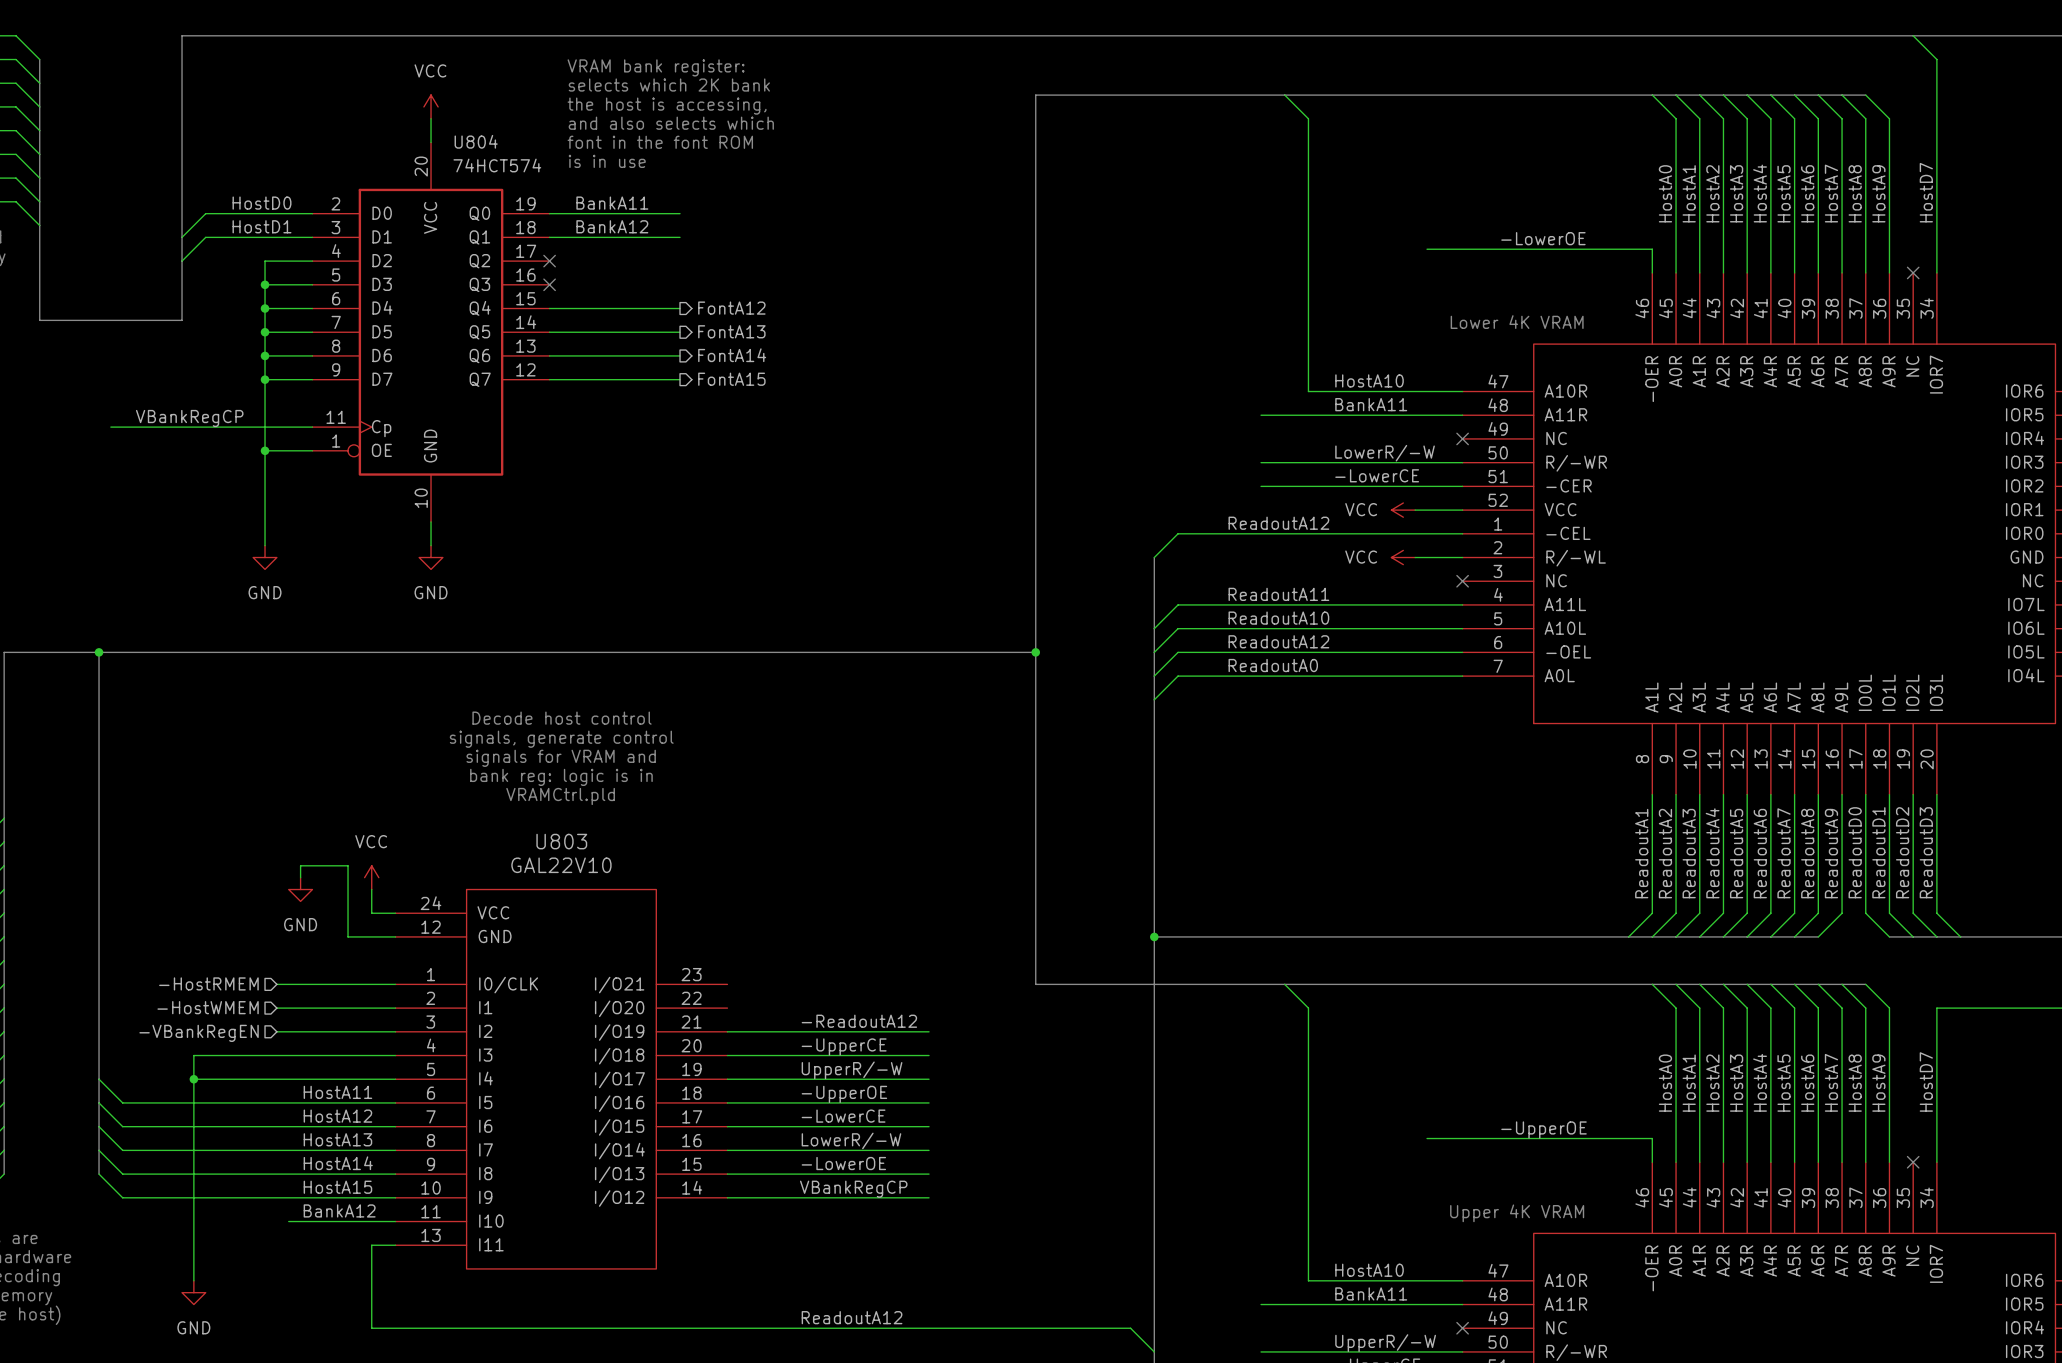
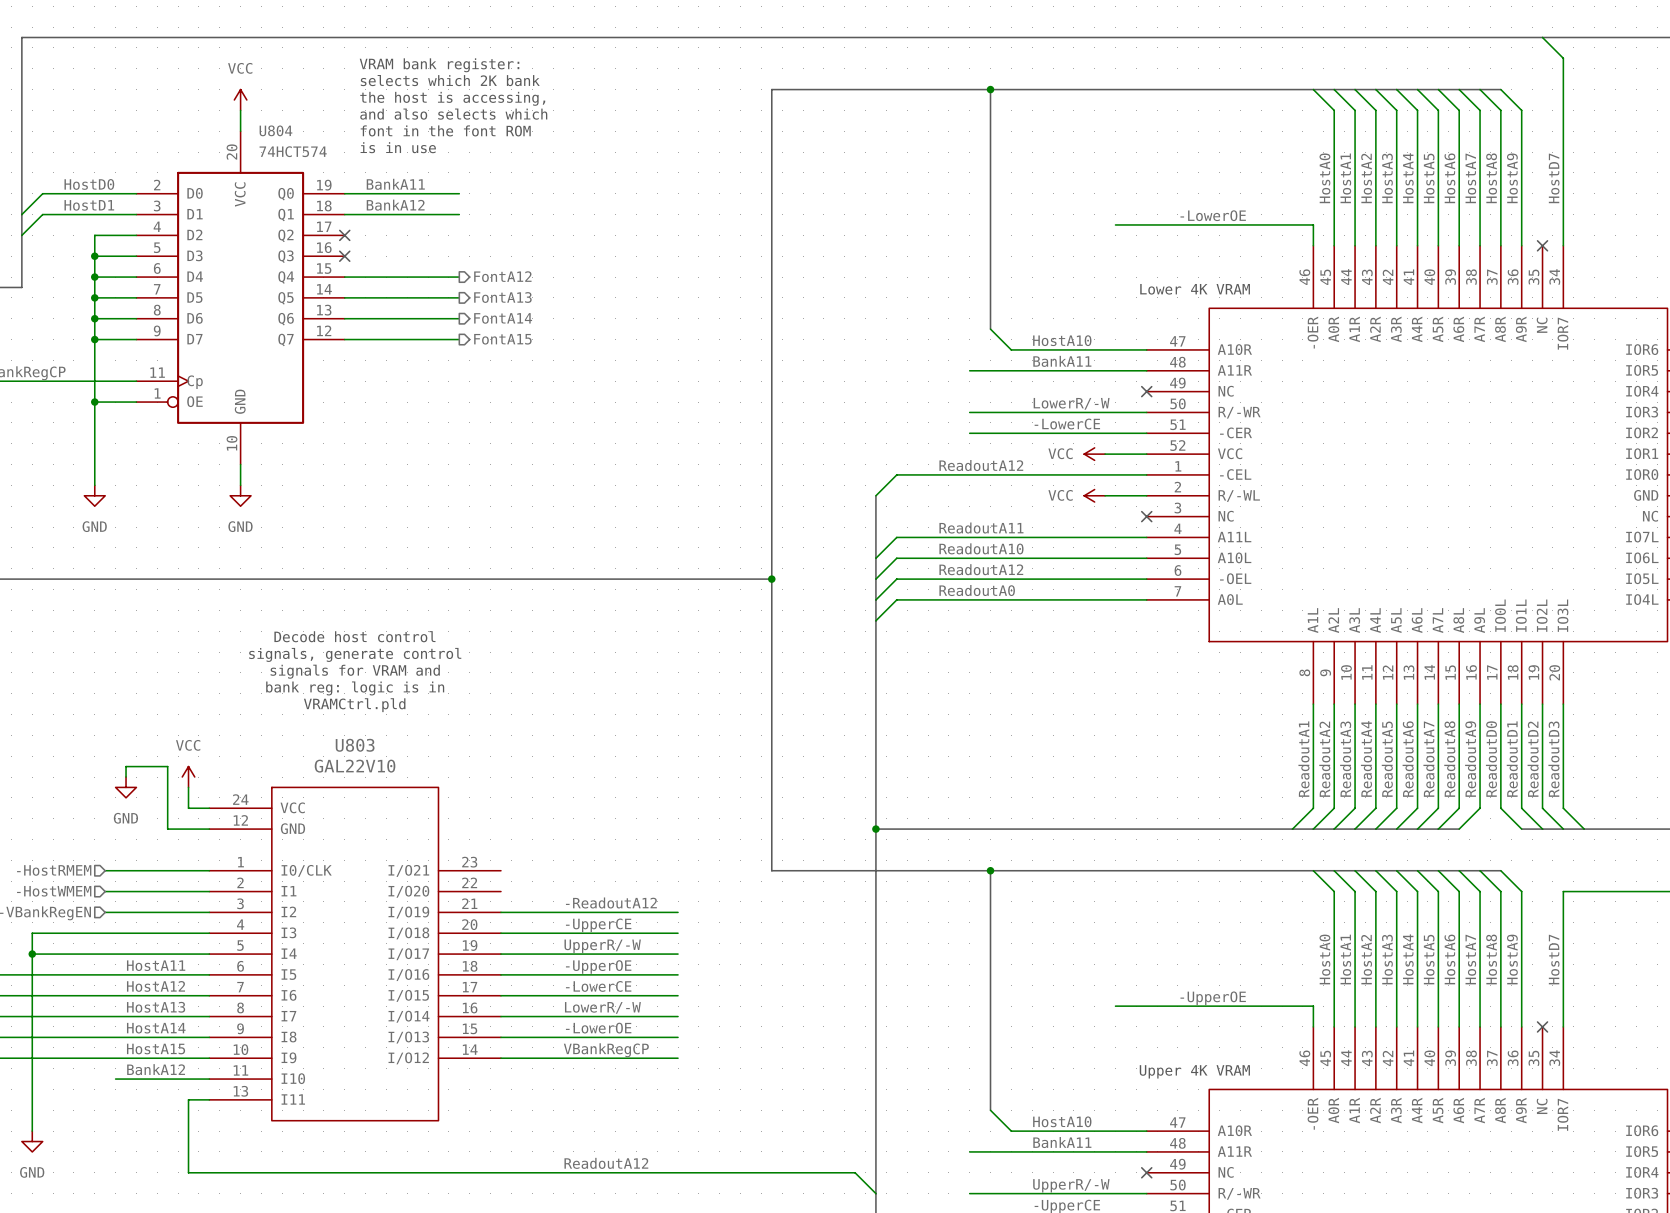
wire: (1284, 95) (1308, 118) (1308, 391) -> (990, 329) (1011, 349)
bus: none -> (990, 89) (990, 329)
junction: none -> (990, 89)
wire: (1284, 984) (1308, 1008) (1308, 1280) -> (990, 1110) (1011, 1131)
bus: none -> (990, 870) (990, 1110)
junction: none -> (990, 870)

